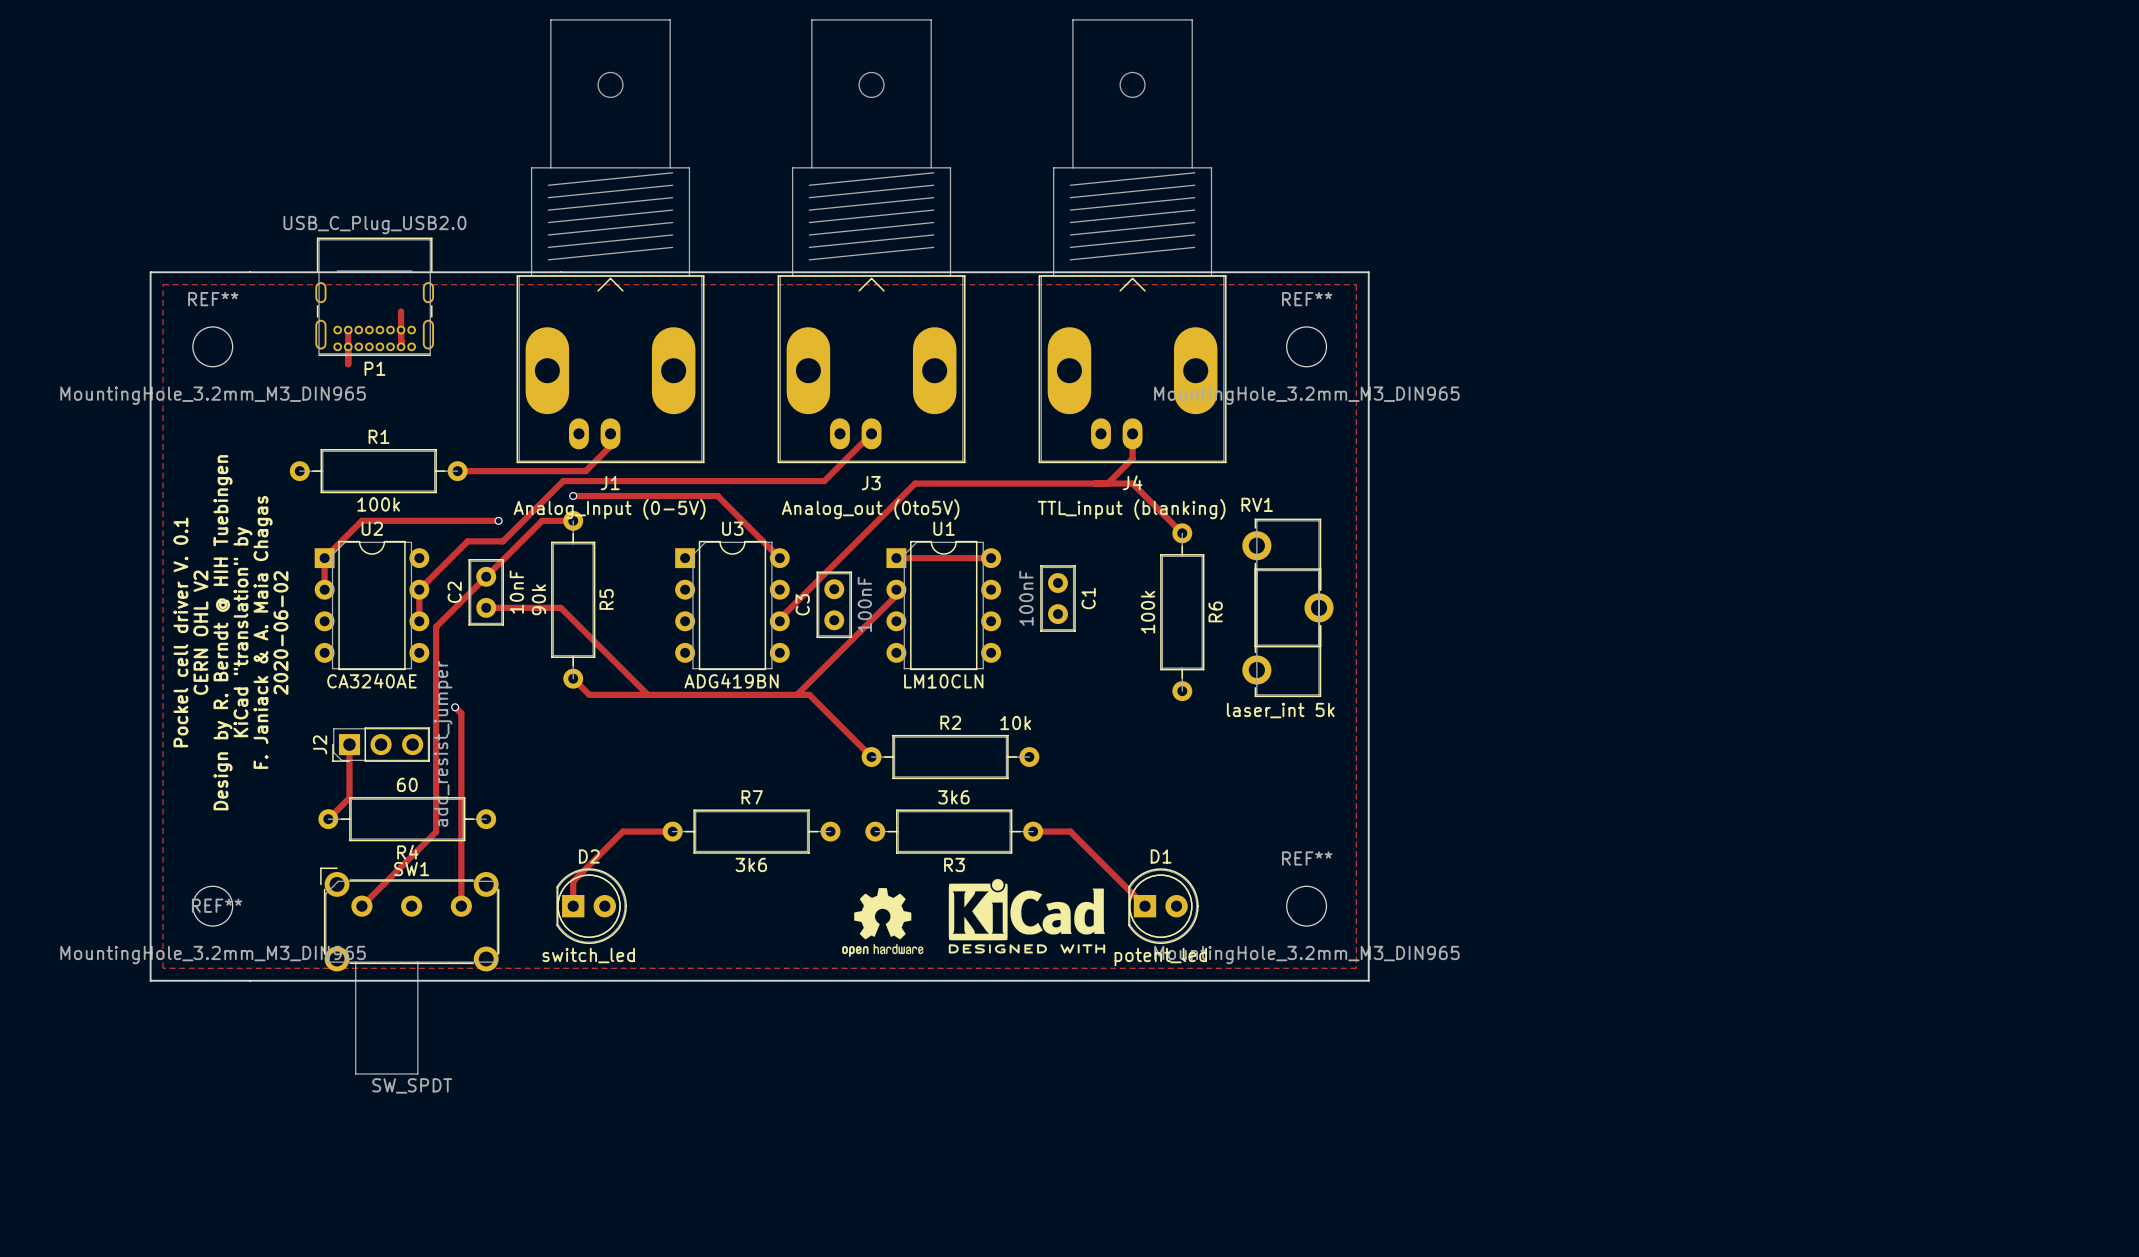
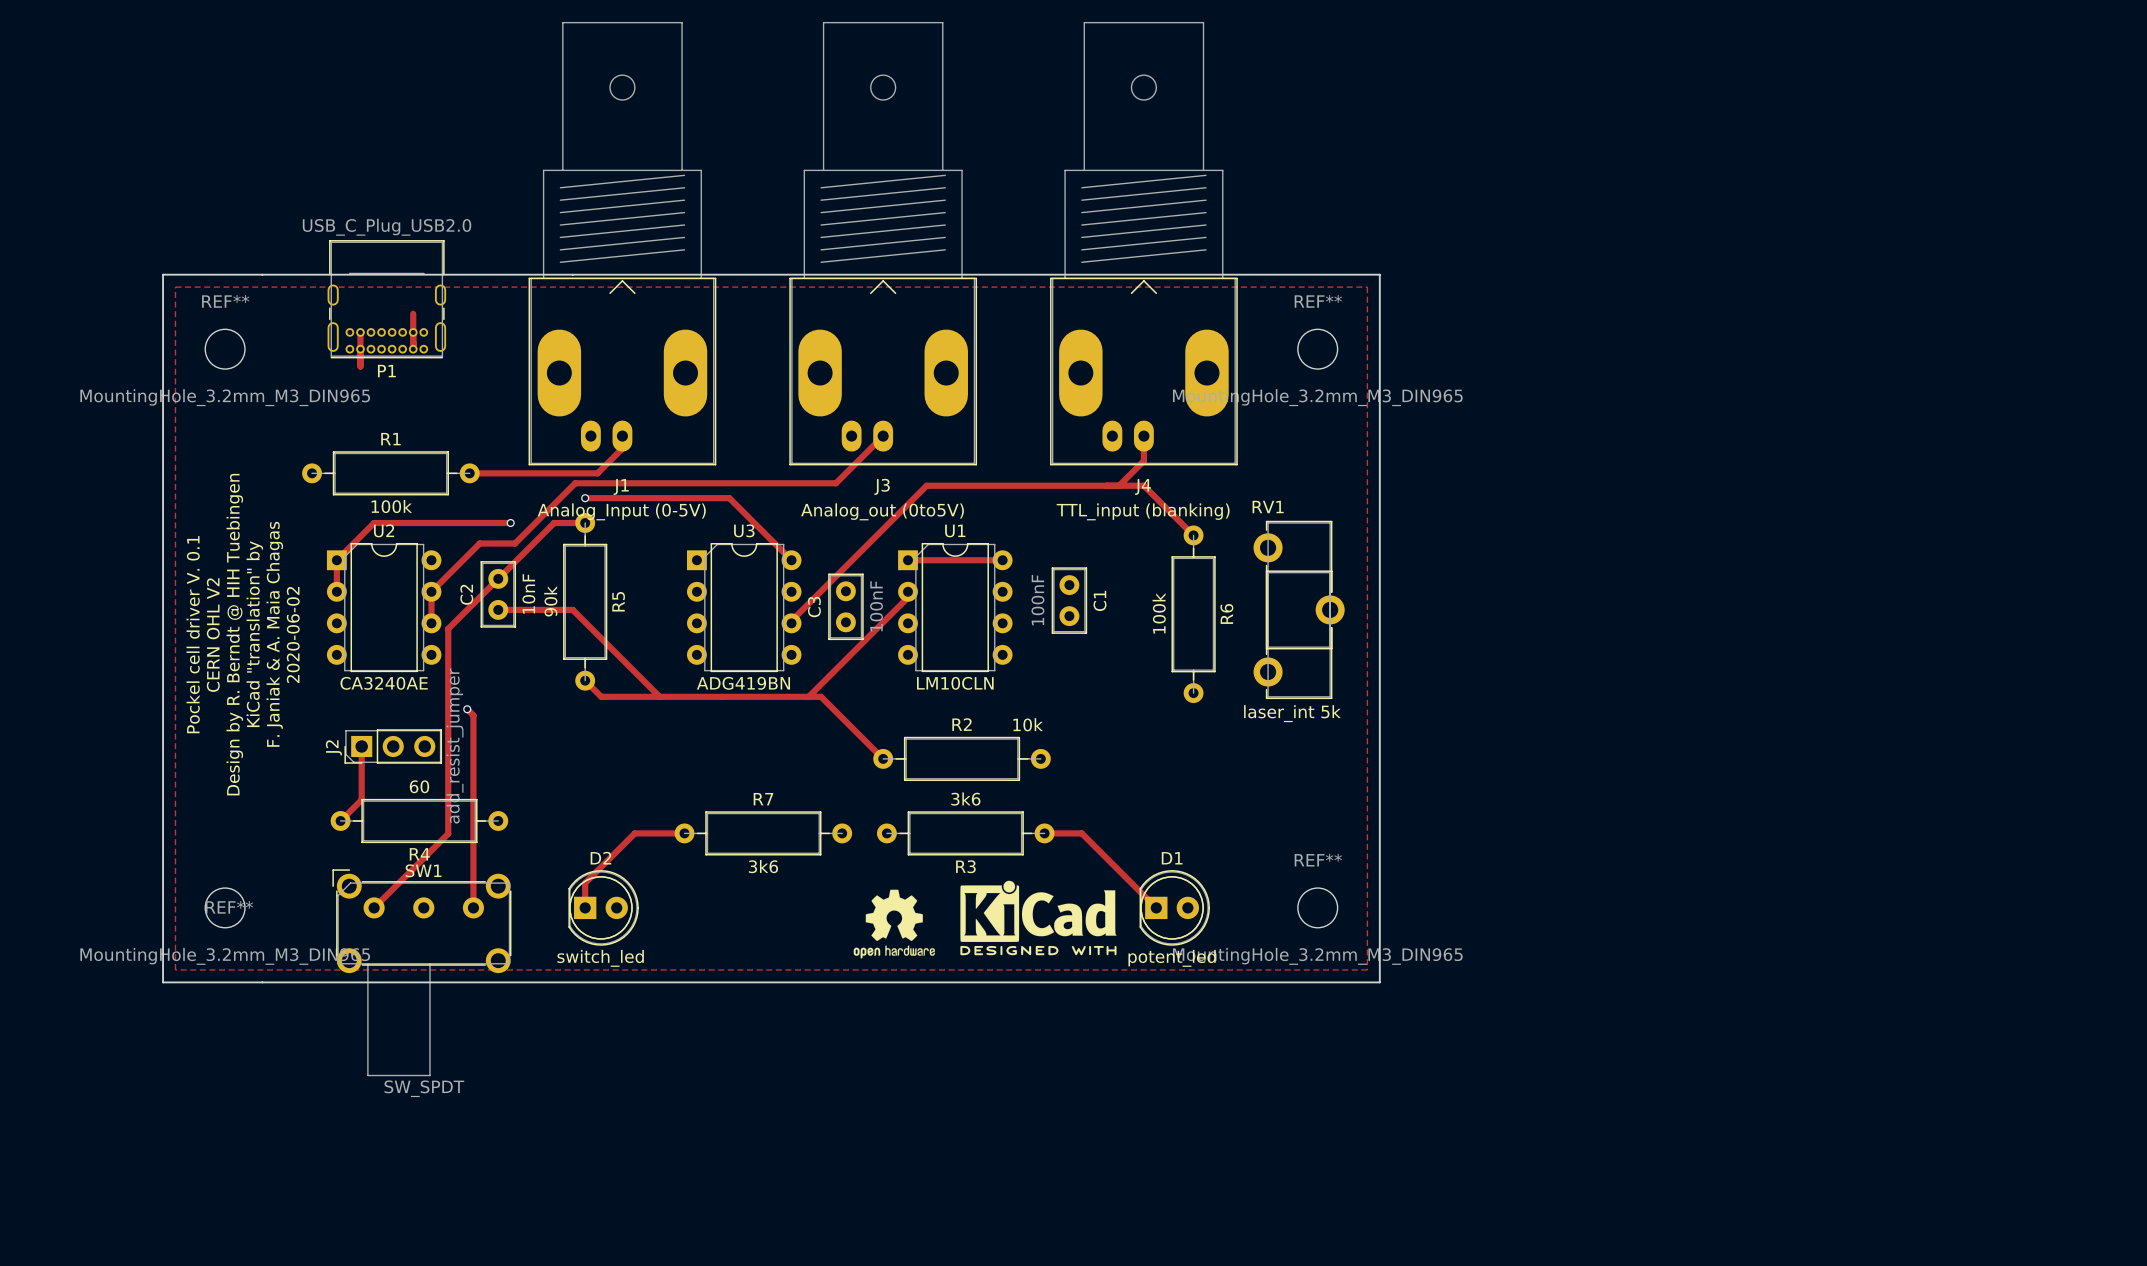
text: F. Janiack & A. Maia Chagas (263, 632) -> F. Janiak & A. Maia Chagas (274, 634)

